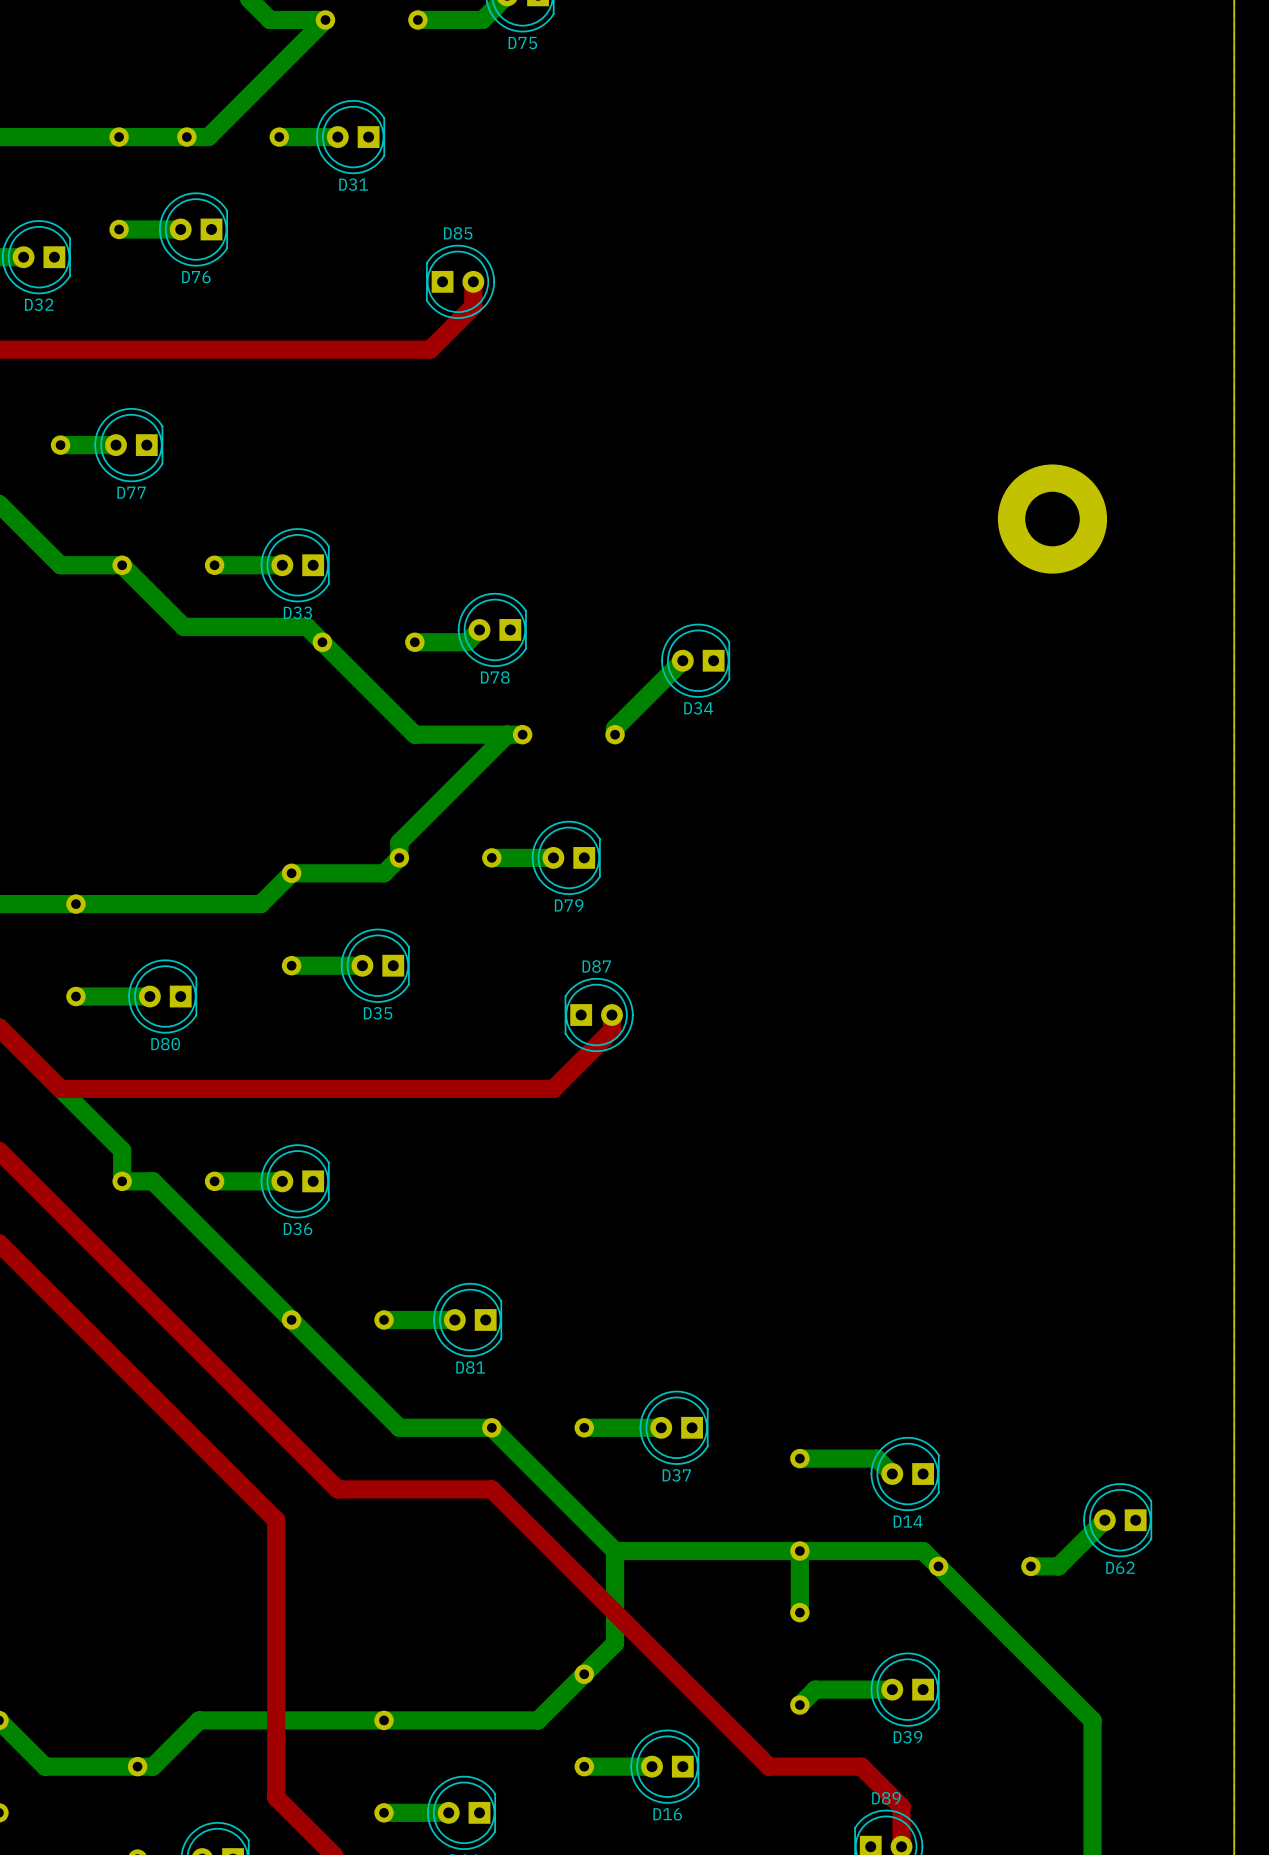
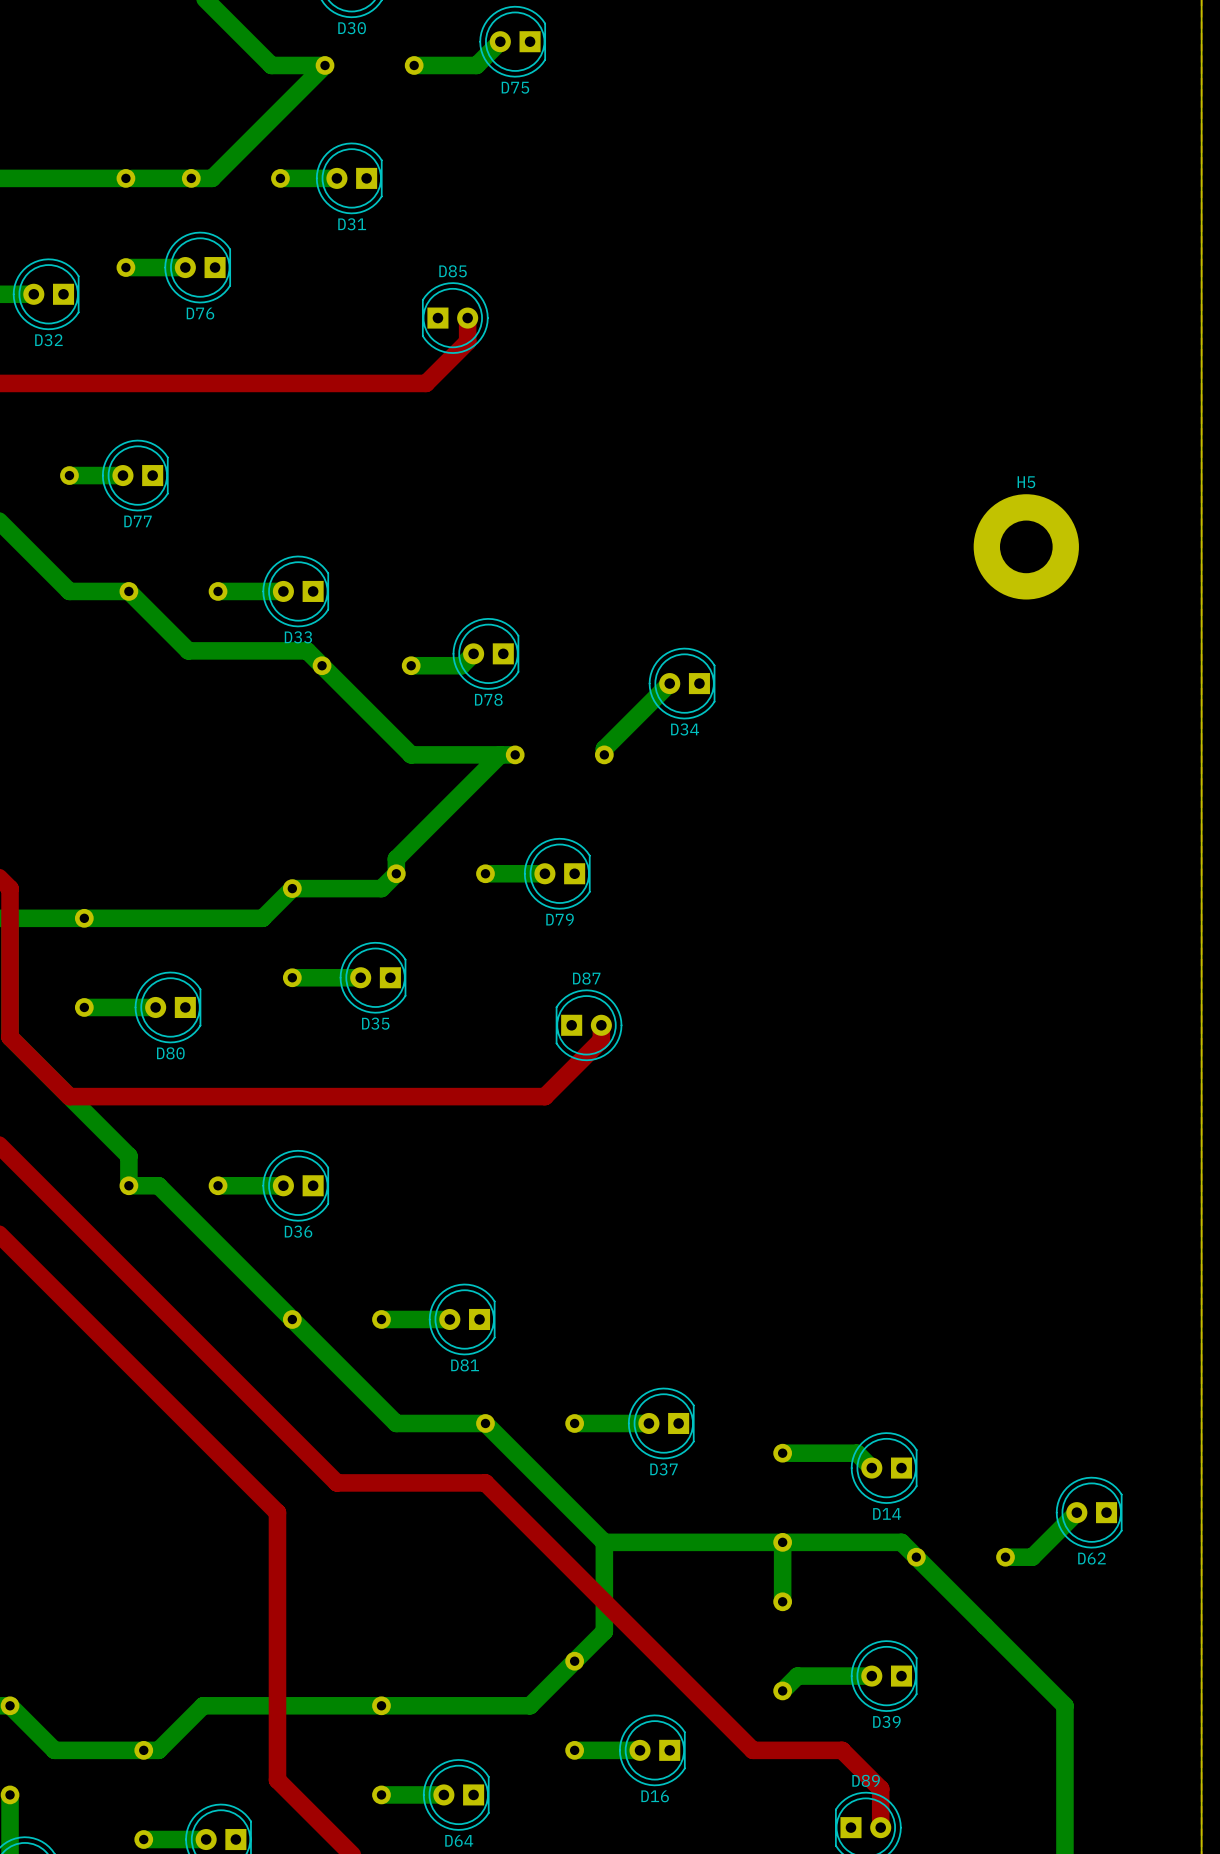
H5 name: none -> H5 (1026, 482)

